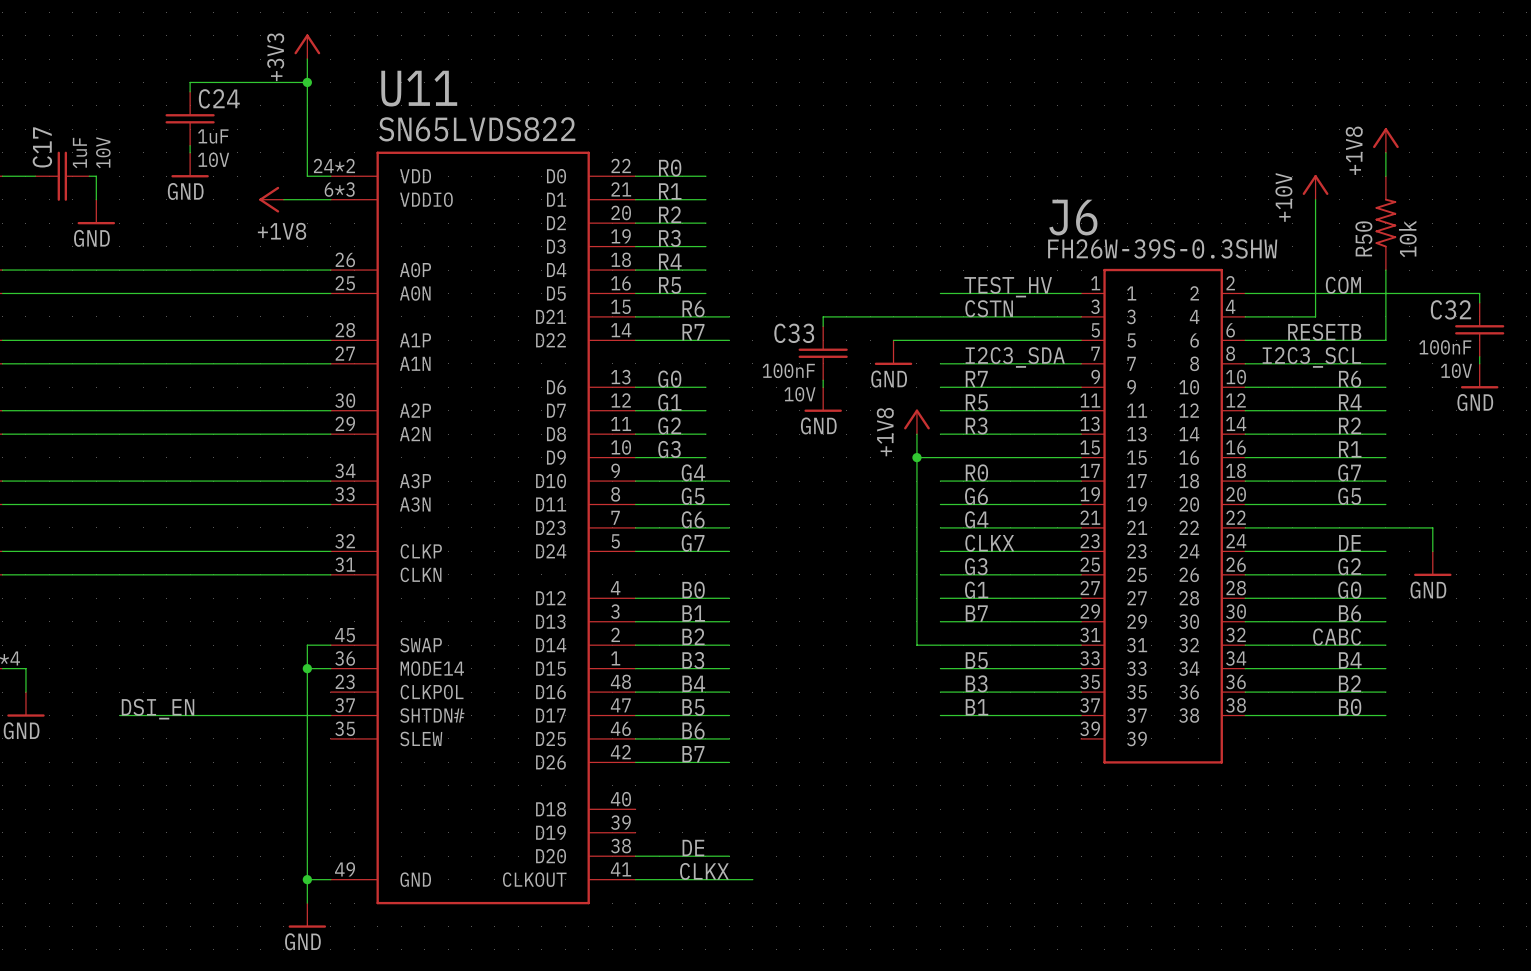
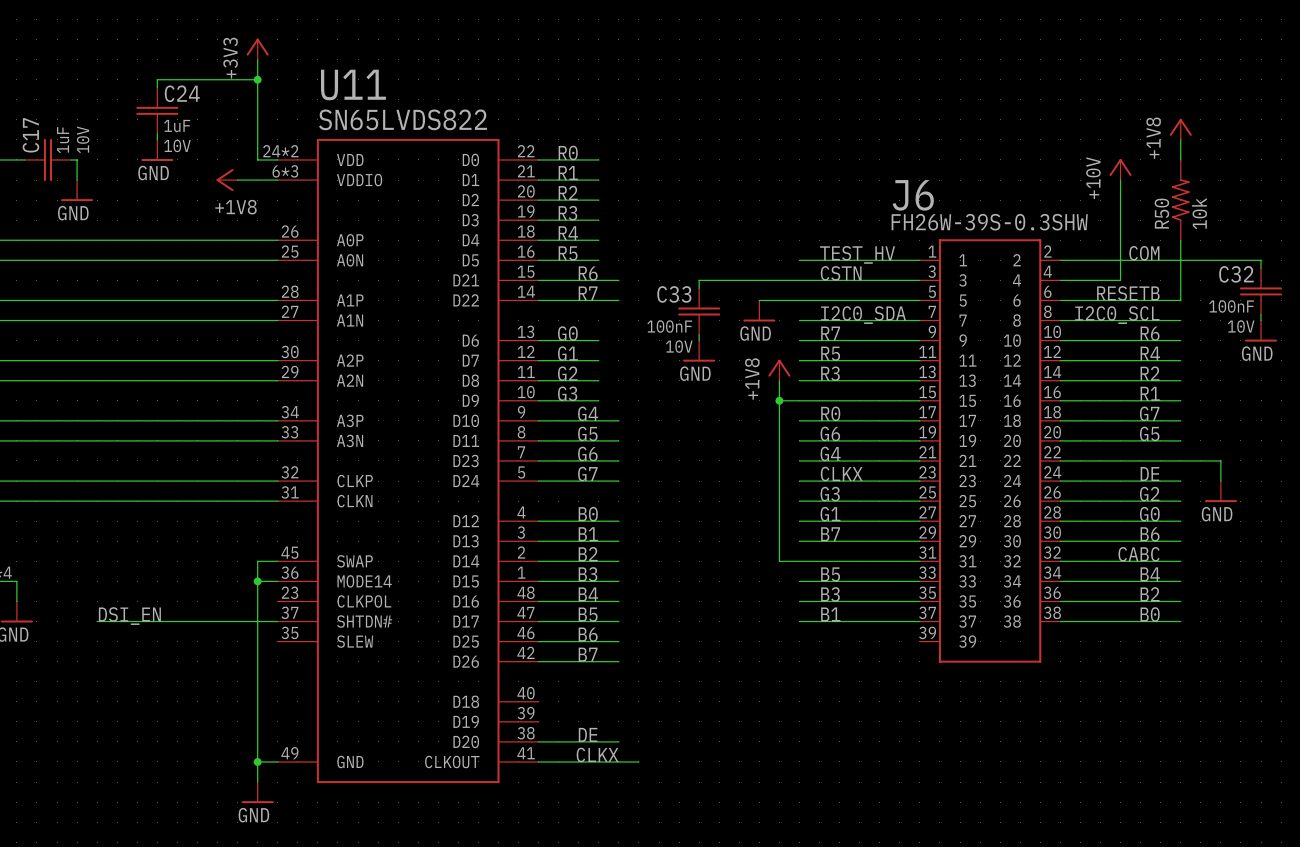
label: I2C3_SDA (1015, 357) -> I2C0_SDA (863, 315)
label: I2C3_SCL (1311, 357) -> I2C0_SCL (1117, 315)

